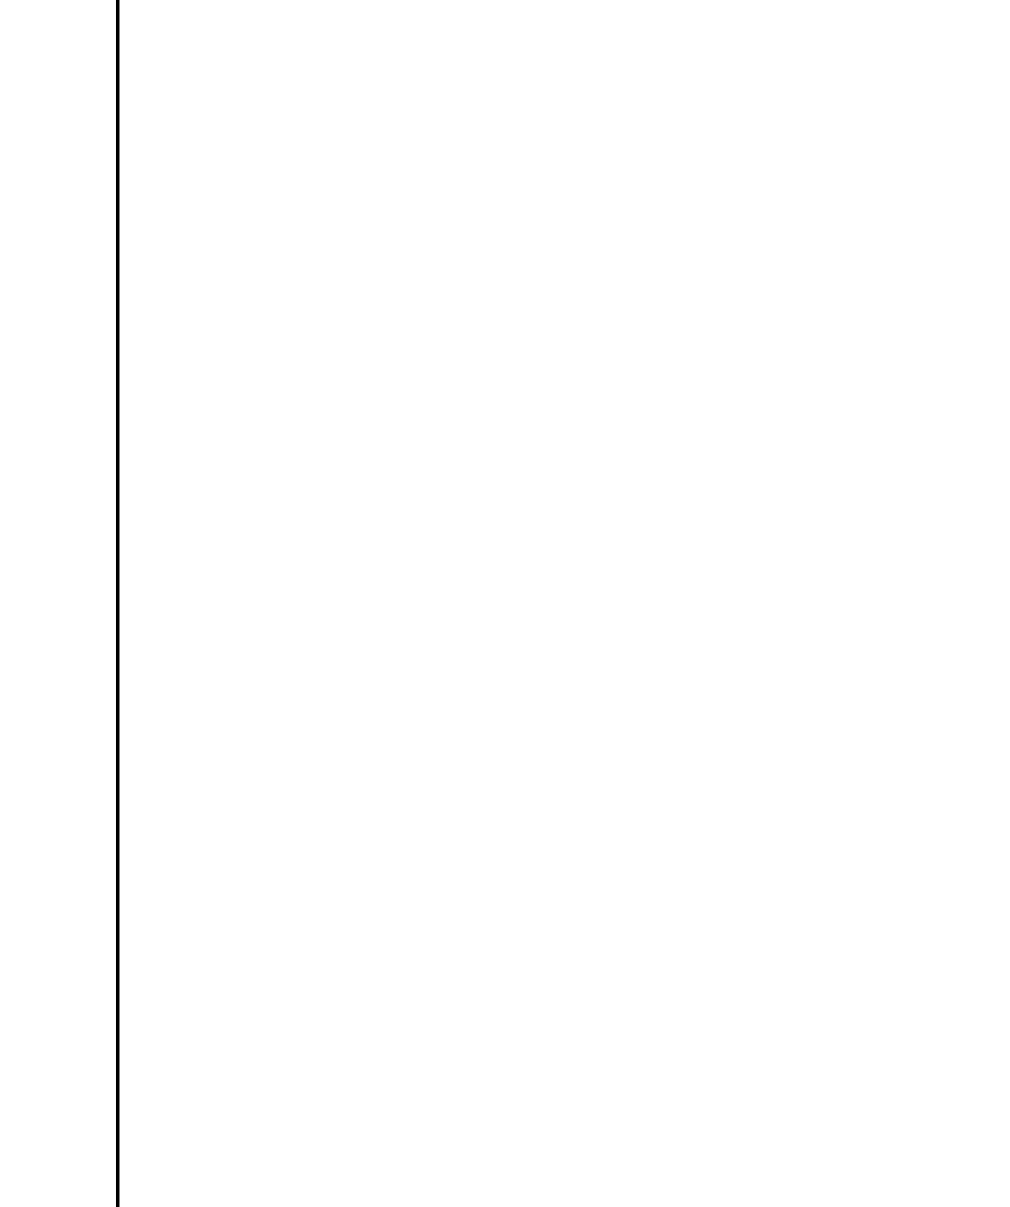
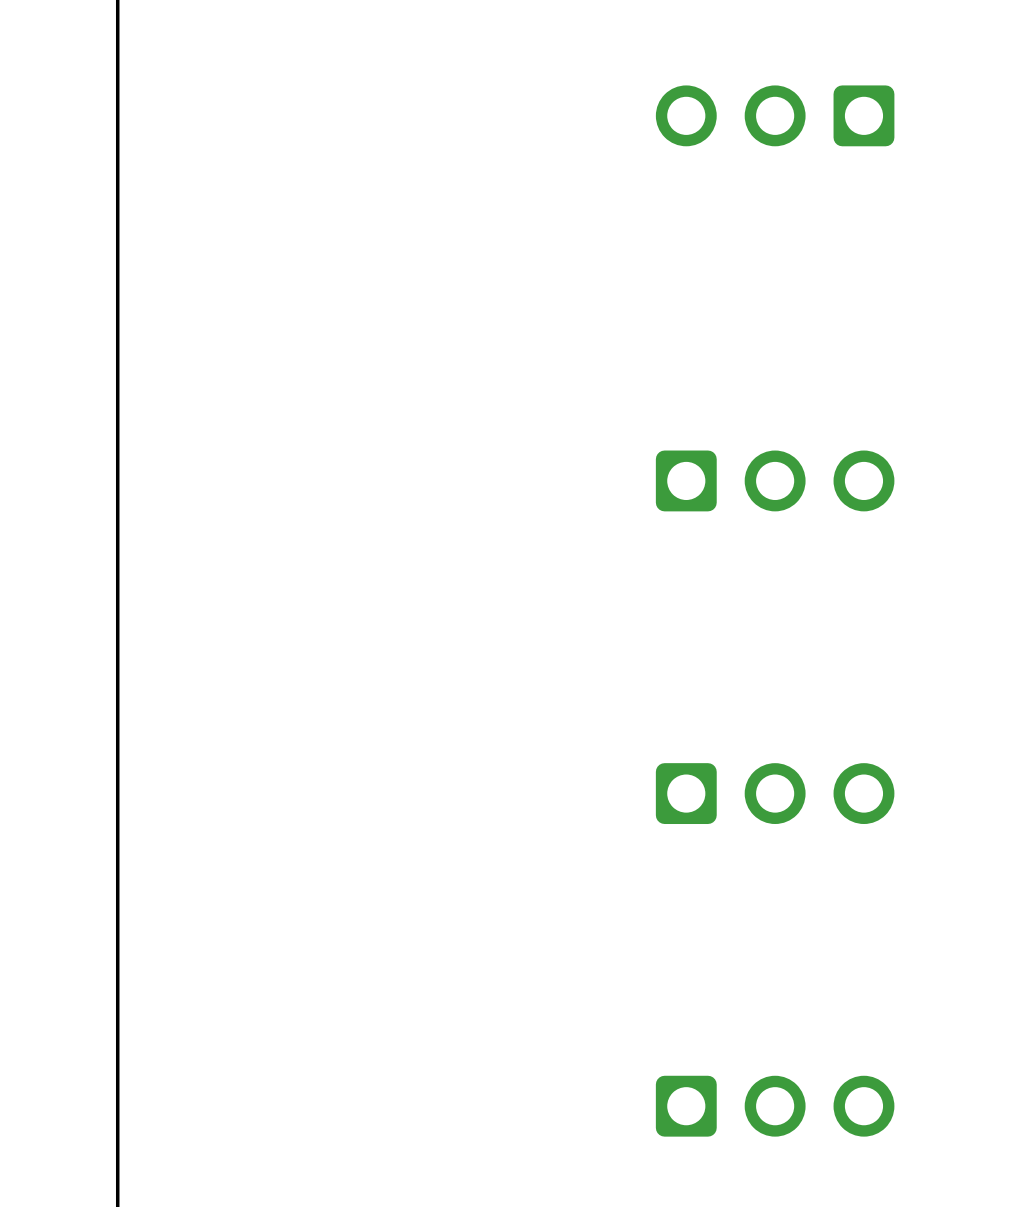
part: none -> (775, 115)
part: none -> (775, 480)
part: none -> (775, 793)
part: none -> (775, 1106)

